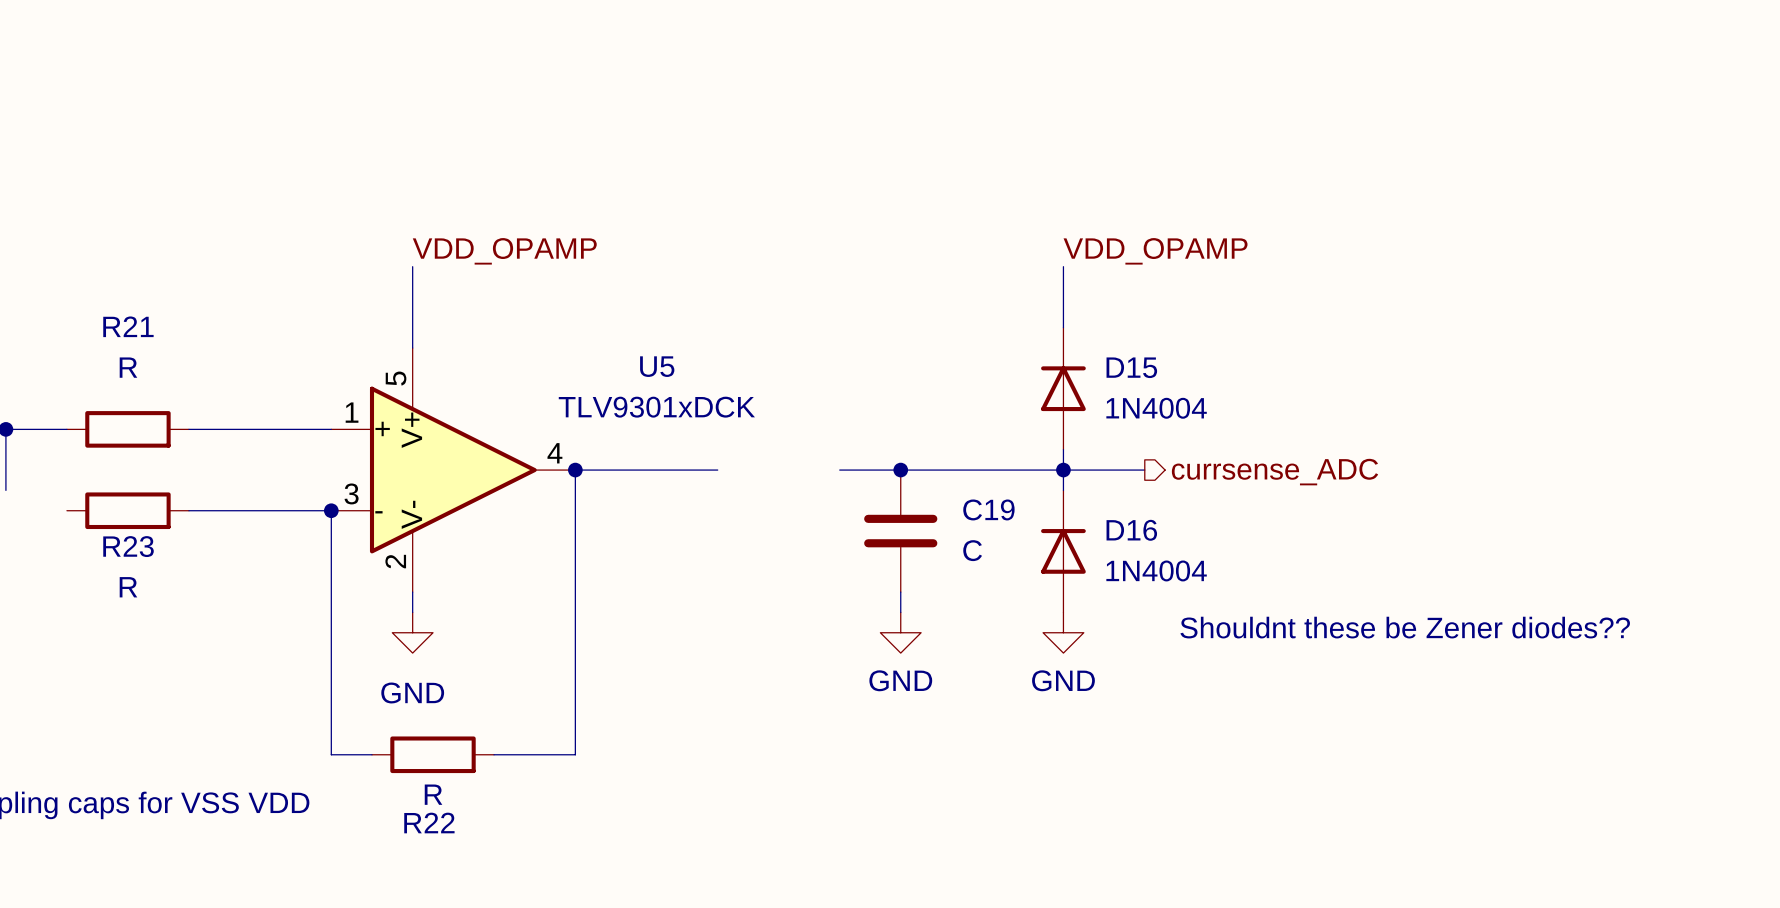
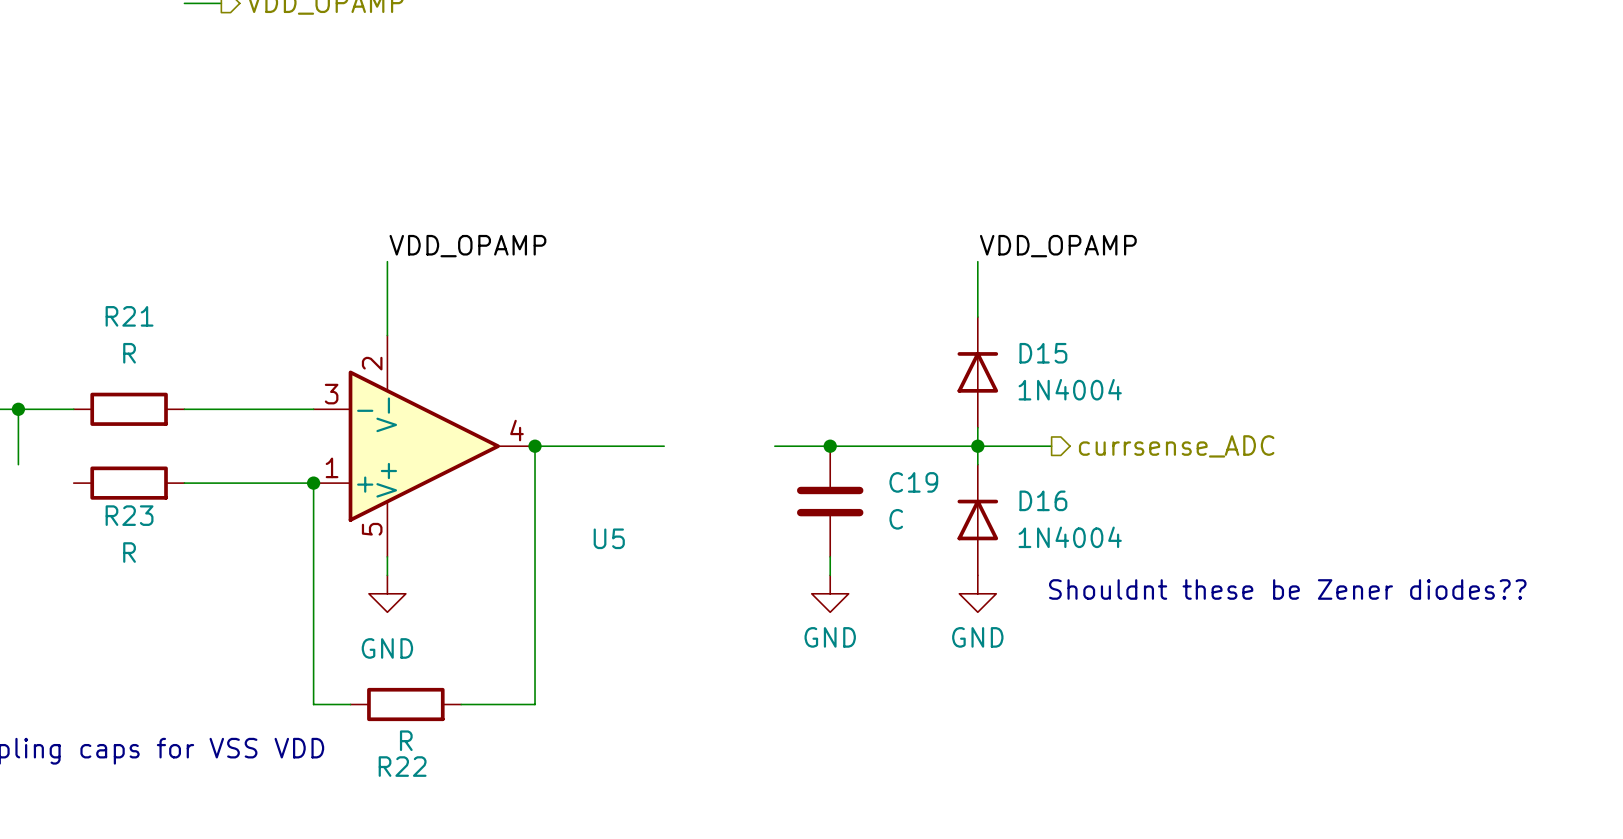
U5 value: TLV9301xDCK (656, 407) -> none
U5 flip: as is (453, 470) -> up-down (424, 446)

